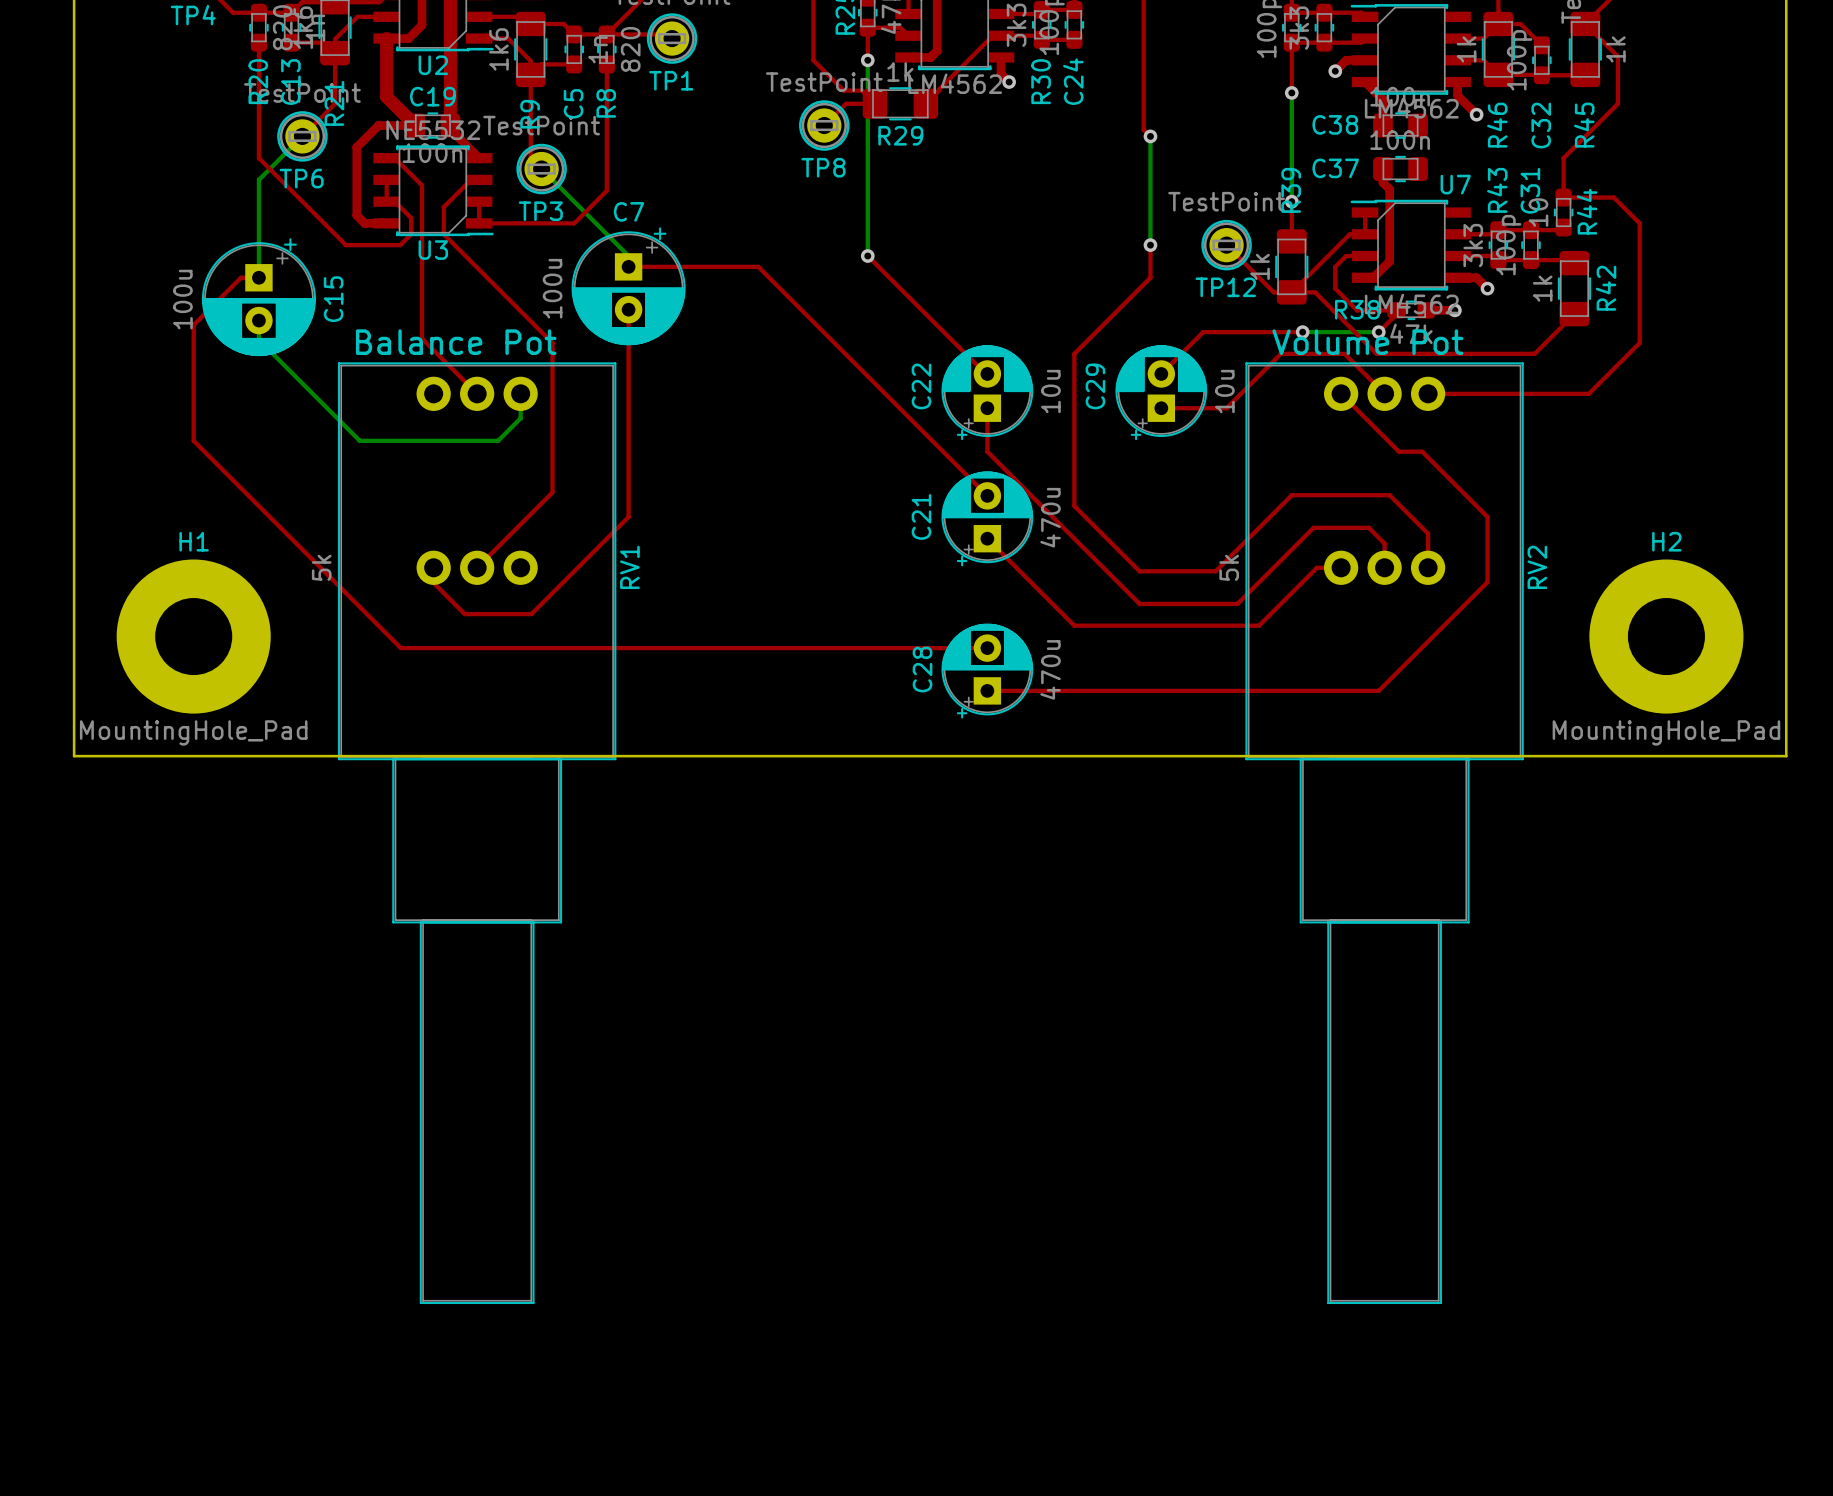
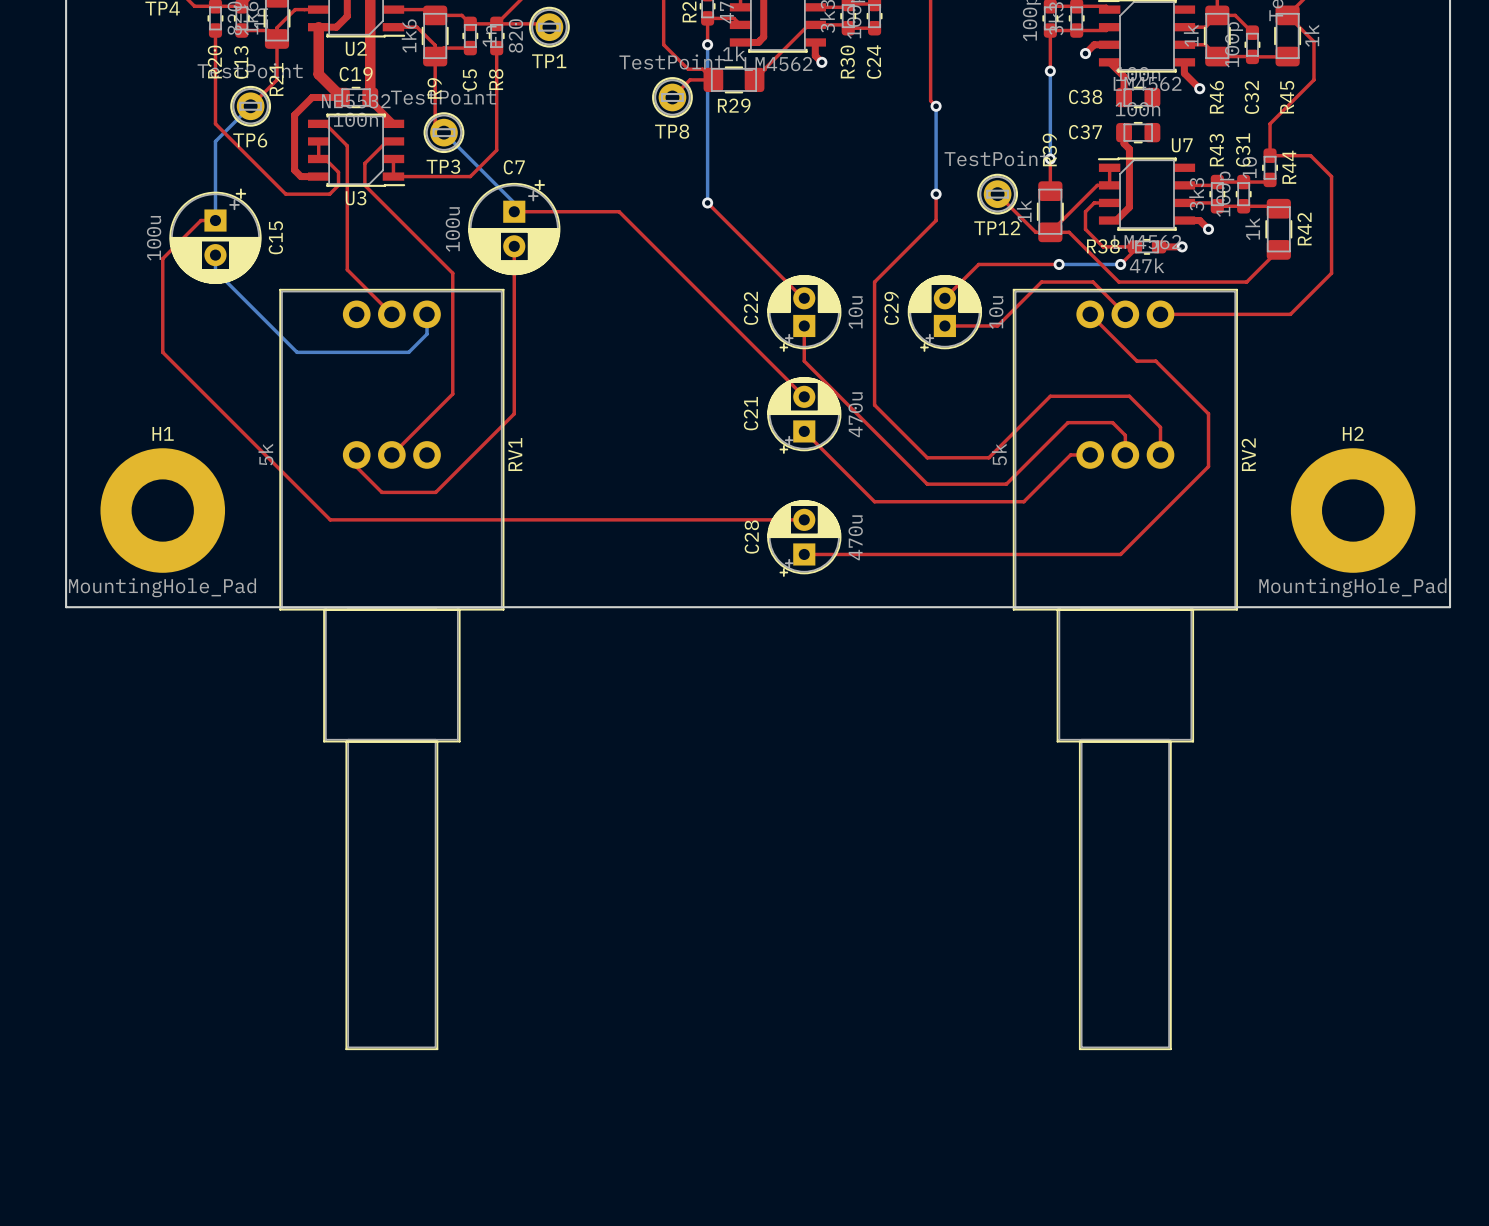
text: Balance Pot (456, 342) -> none
text: Volume Pot (1367, 342) -> none

